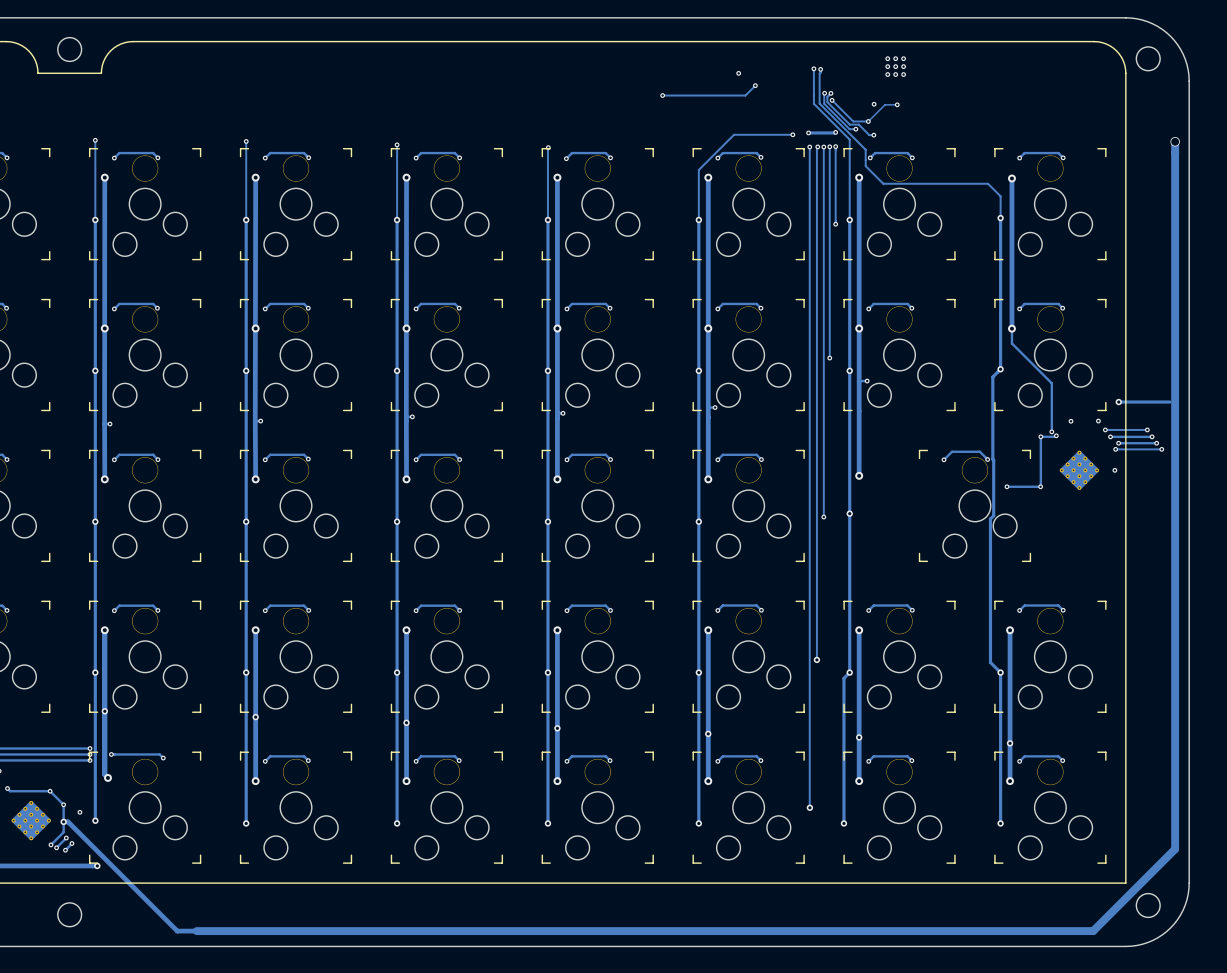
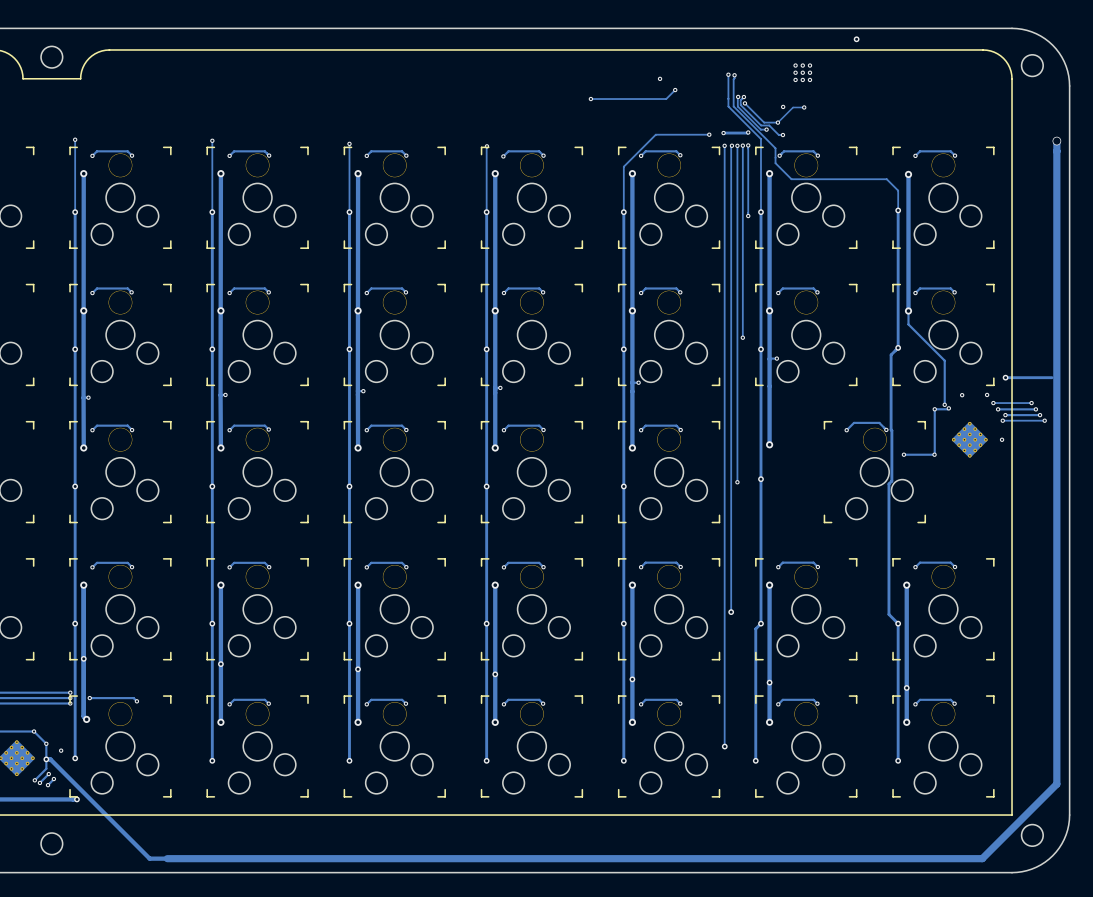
via: none -> (856, 39)

